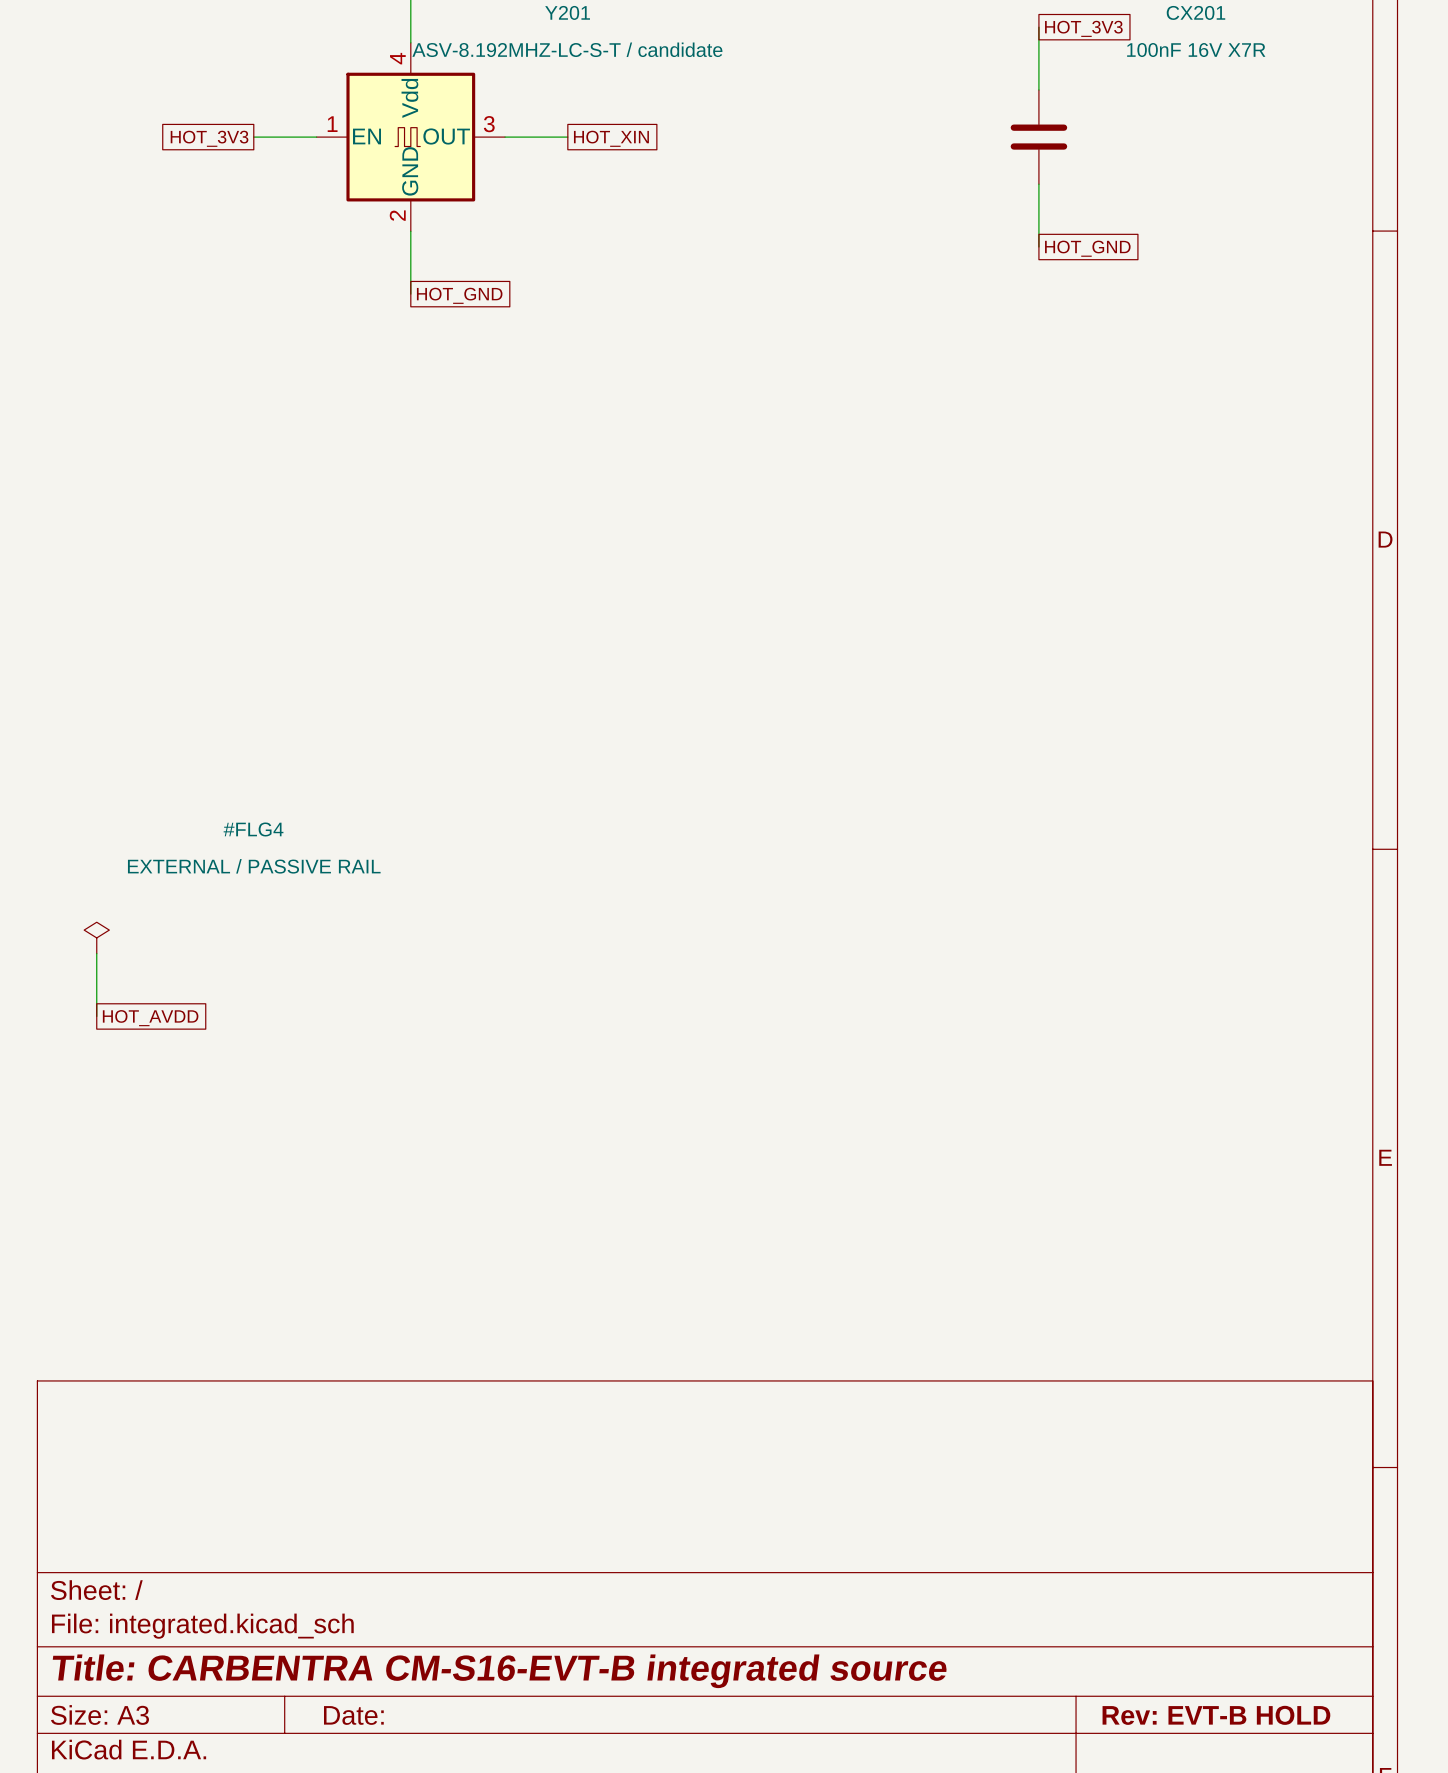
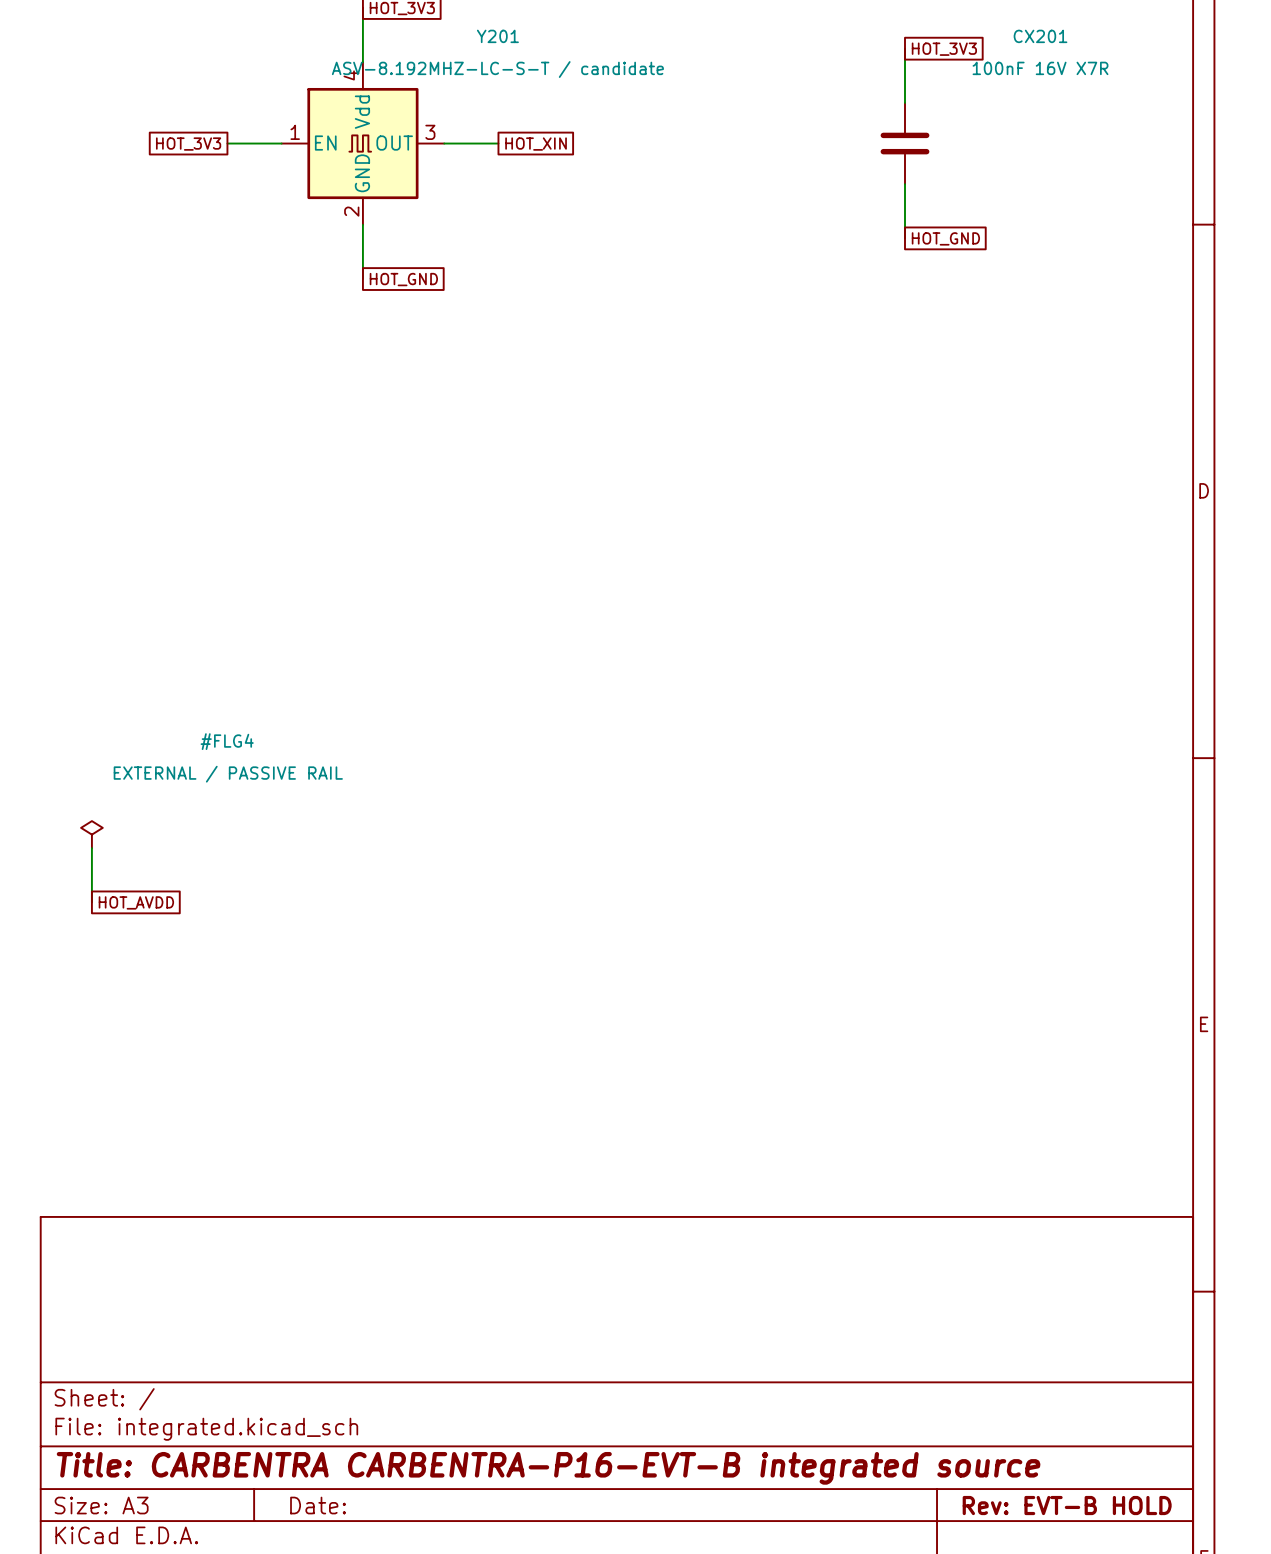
title block: Title: CARBENTRA CM-S16-EVT-B integrated source (499, 1671) -> Title: CARBENTRA CARBENTRA-P16-EVT-B integrated source (548, 1468)

